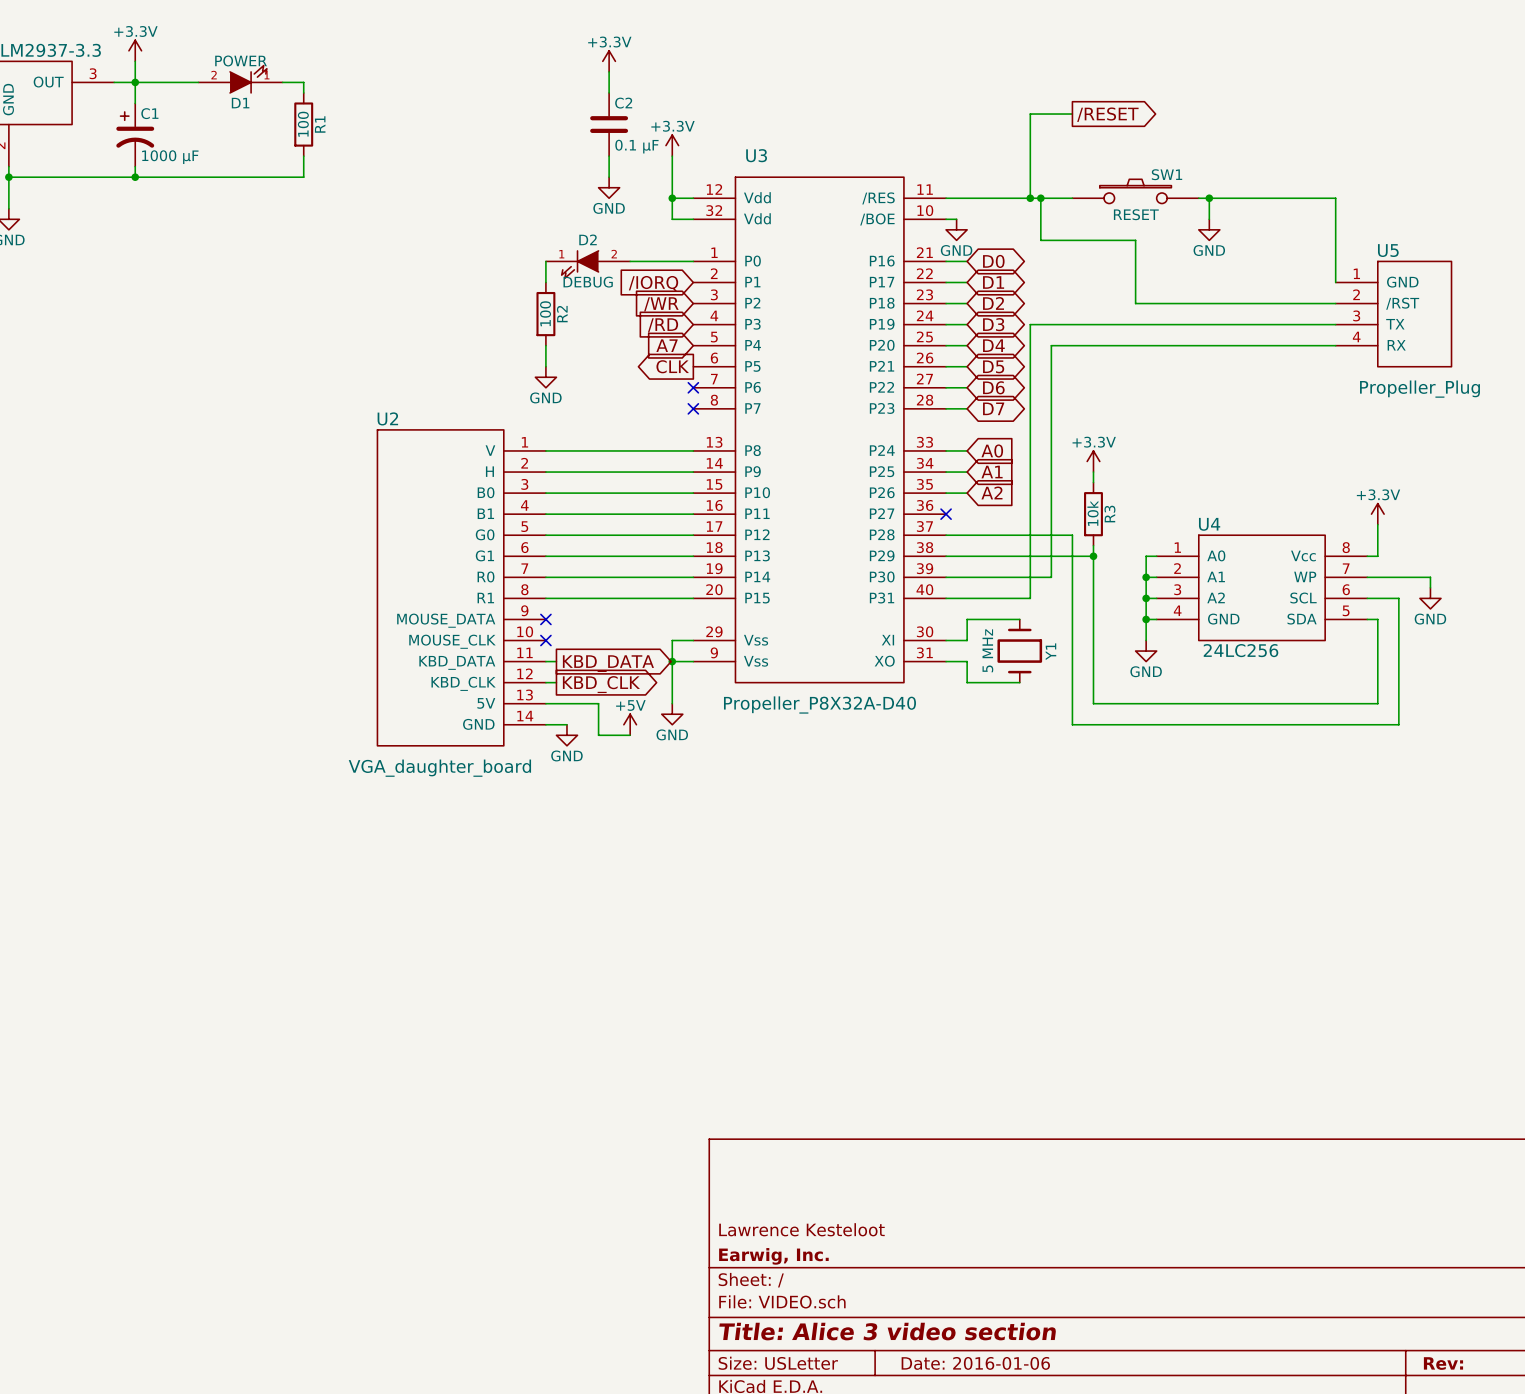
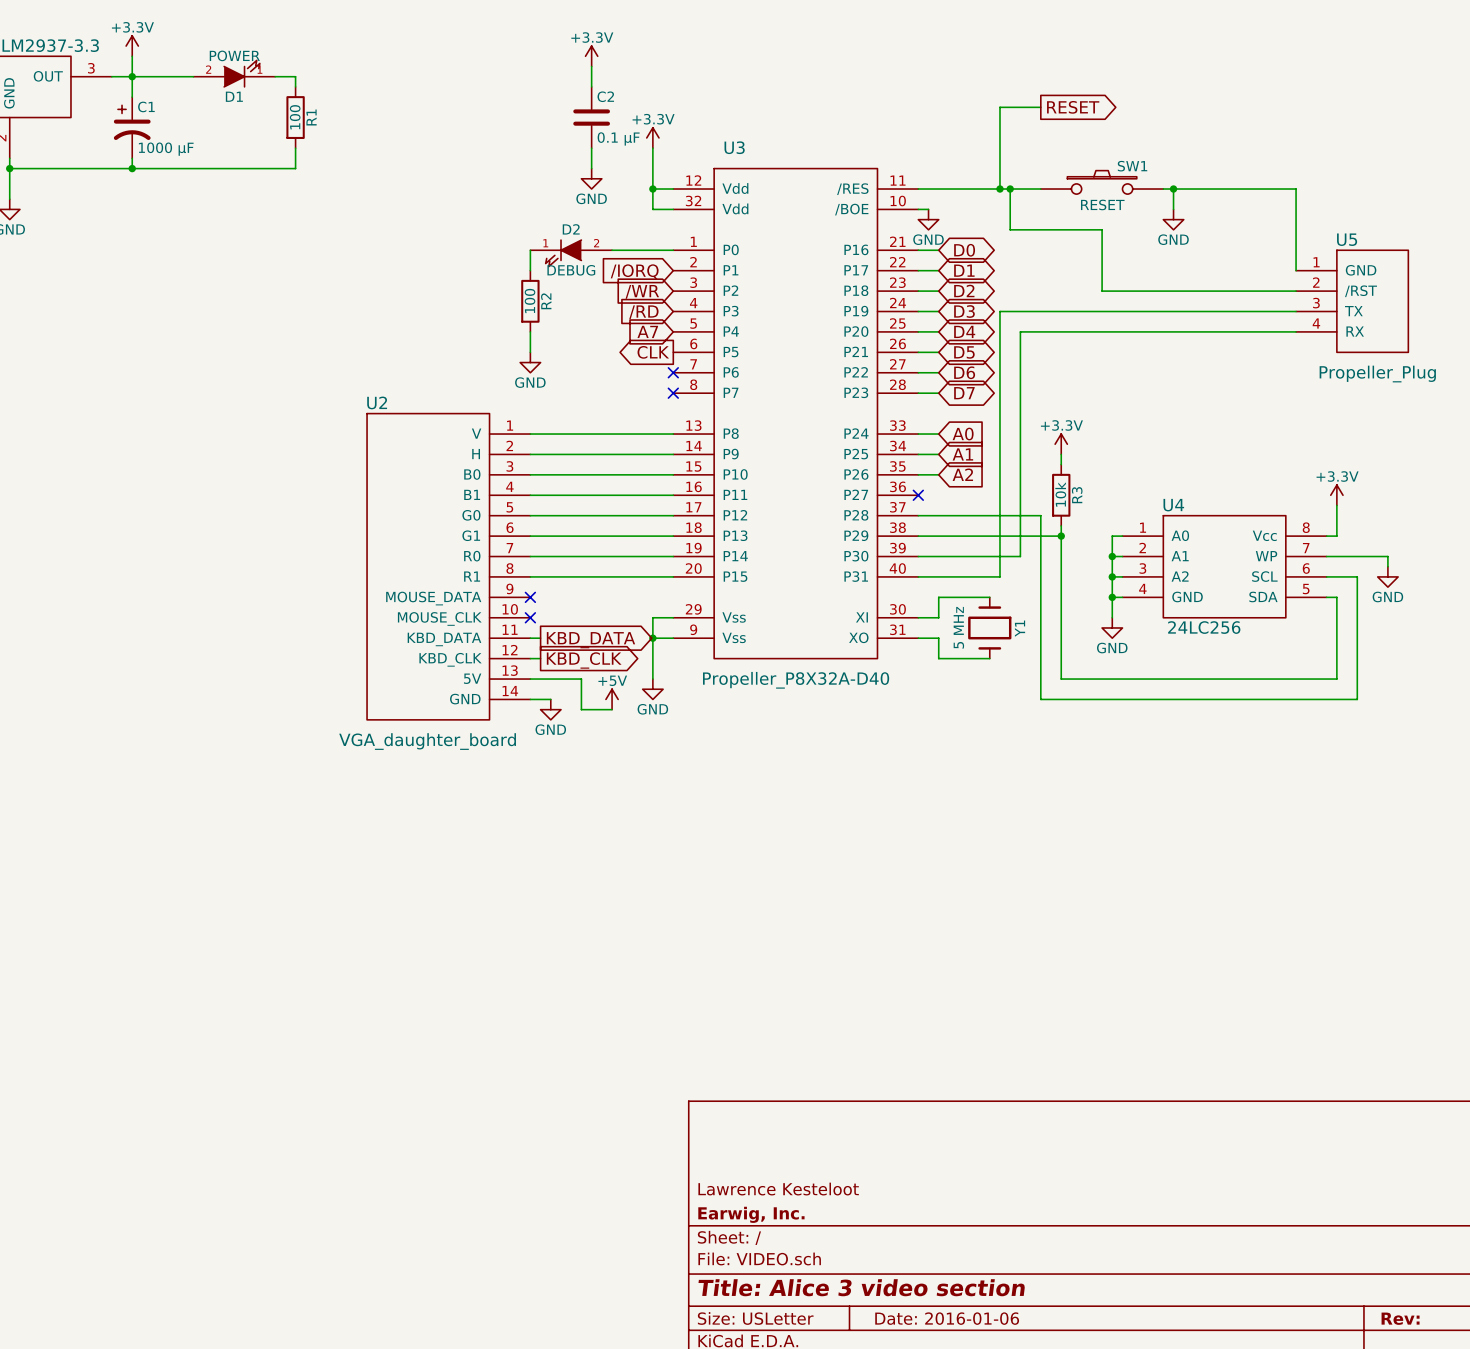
global label: /RESET (1107, 114) -> RESET (1073, 107)

